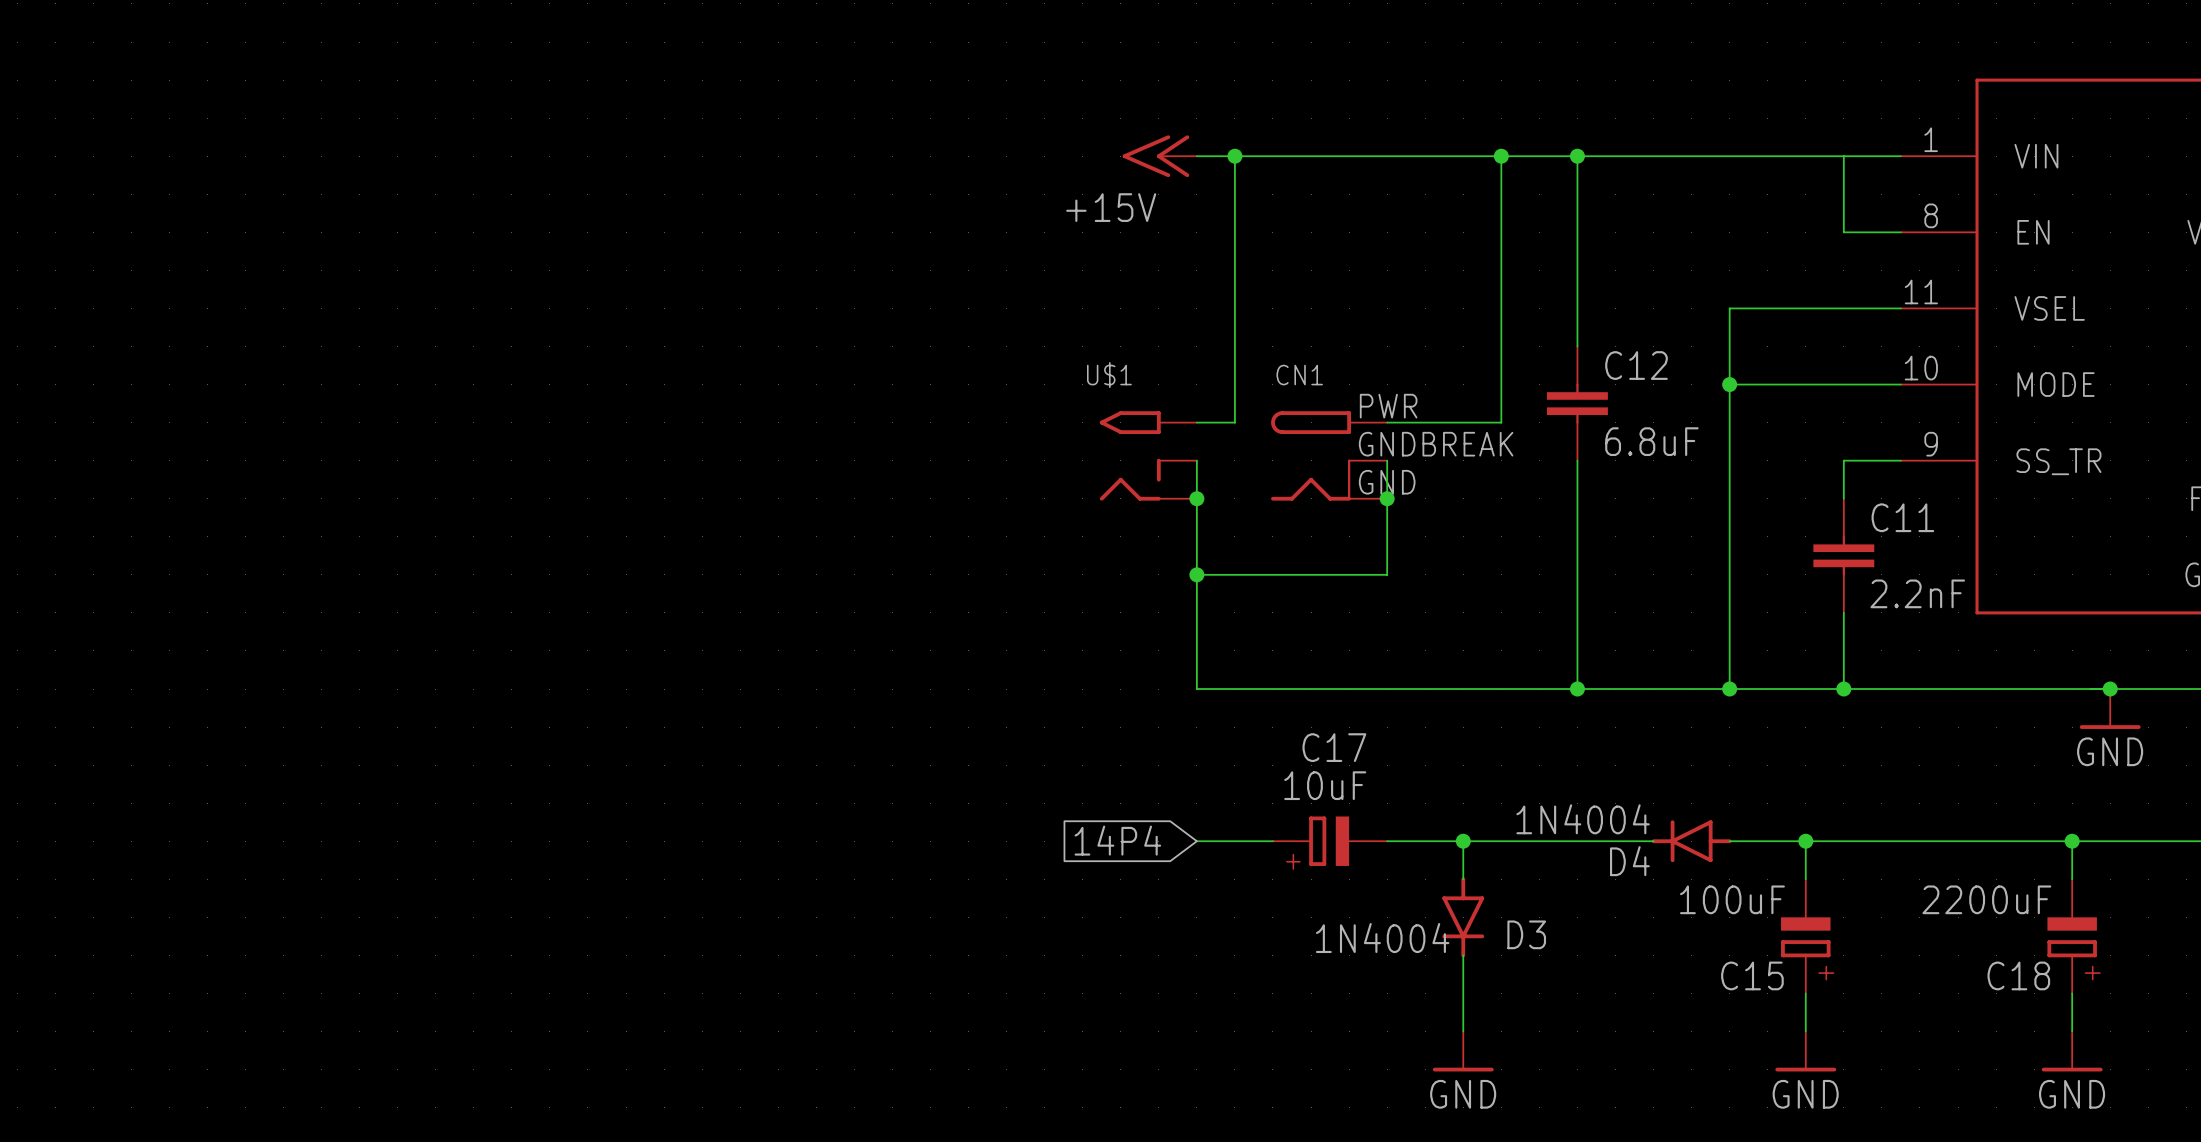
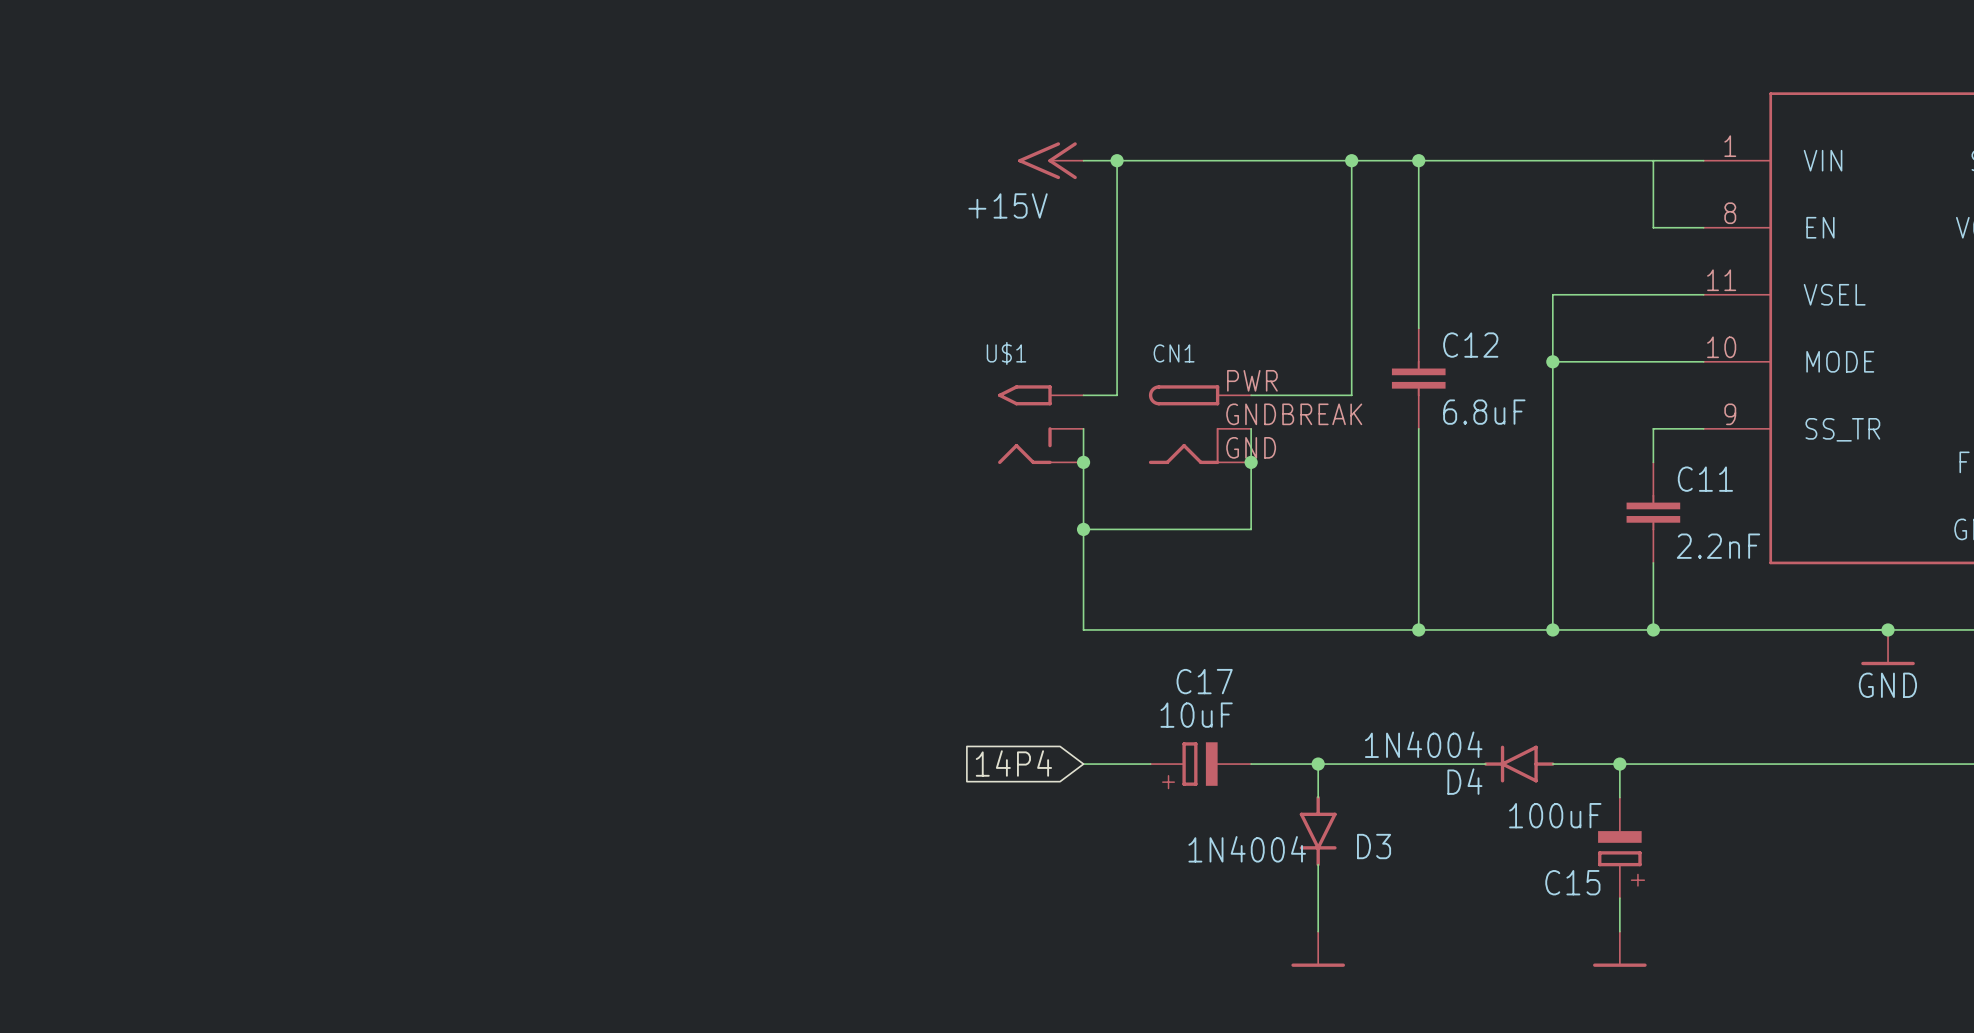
wire: (2072, 841) (2072, 879) -> none
junction: (2072, 841) -> none
C18: 2200uF (2072, 936) -> none
wire: (2072, 993) (2072, 1031) -> none
power symbol: GND (2072, 1051) -> none
power symbol text: GND (1463, 1094) -> none
power symbol text: GND (1805, 1094) -> none

